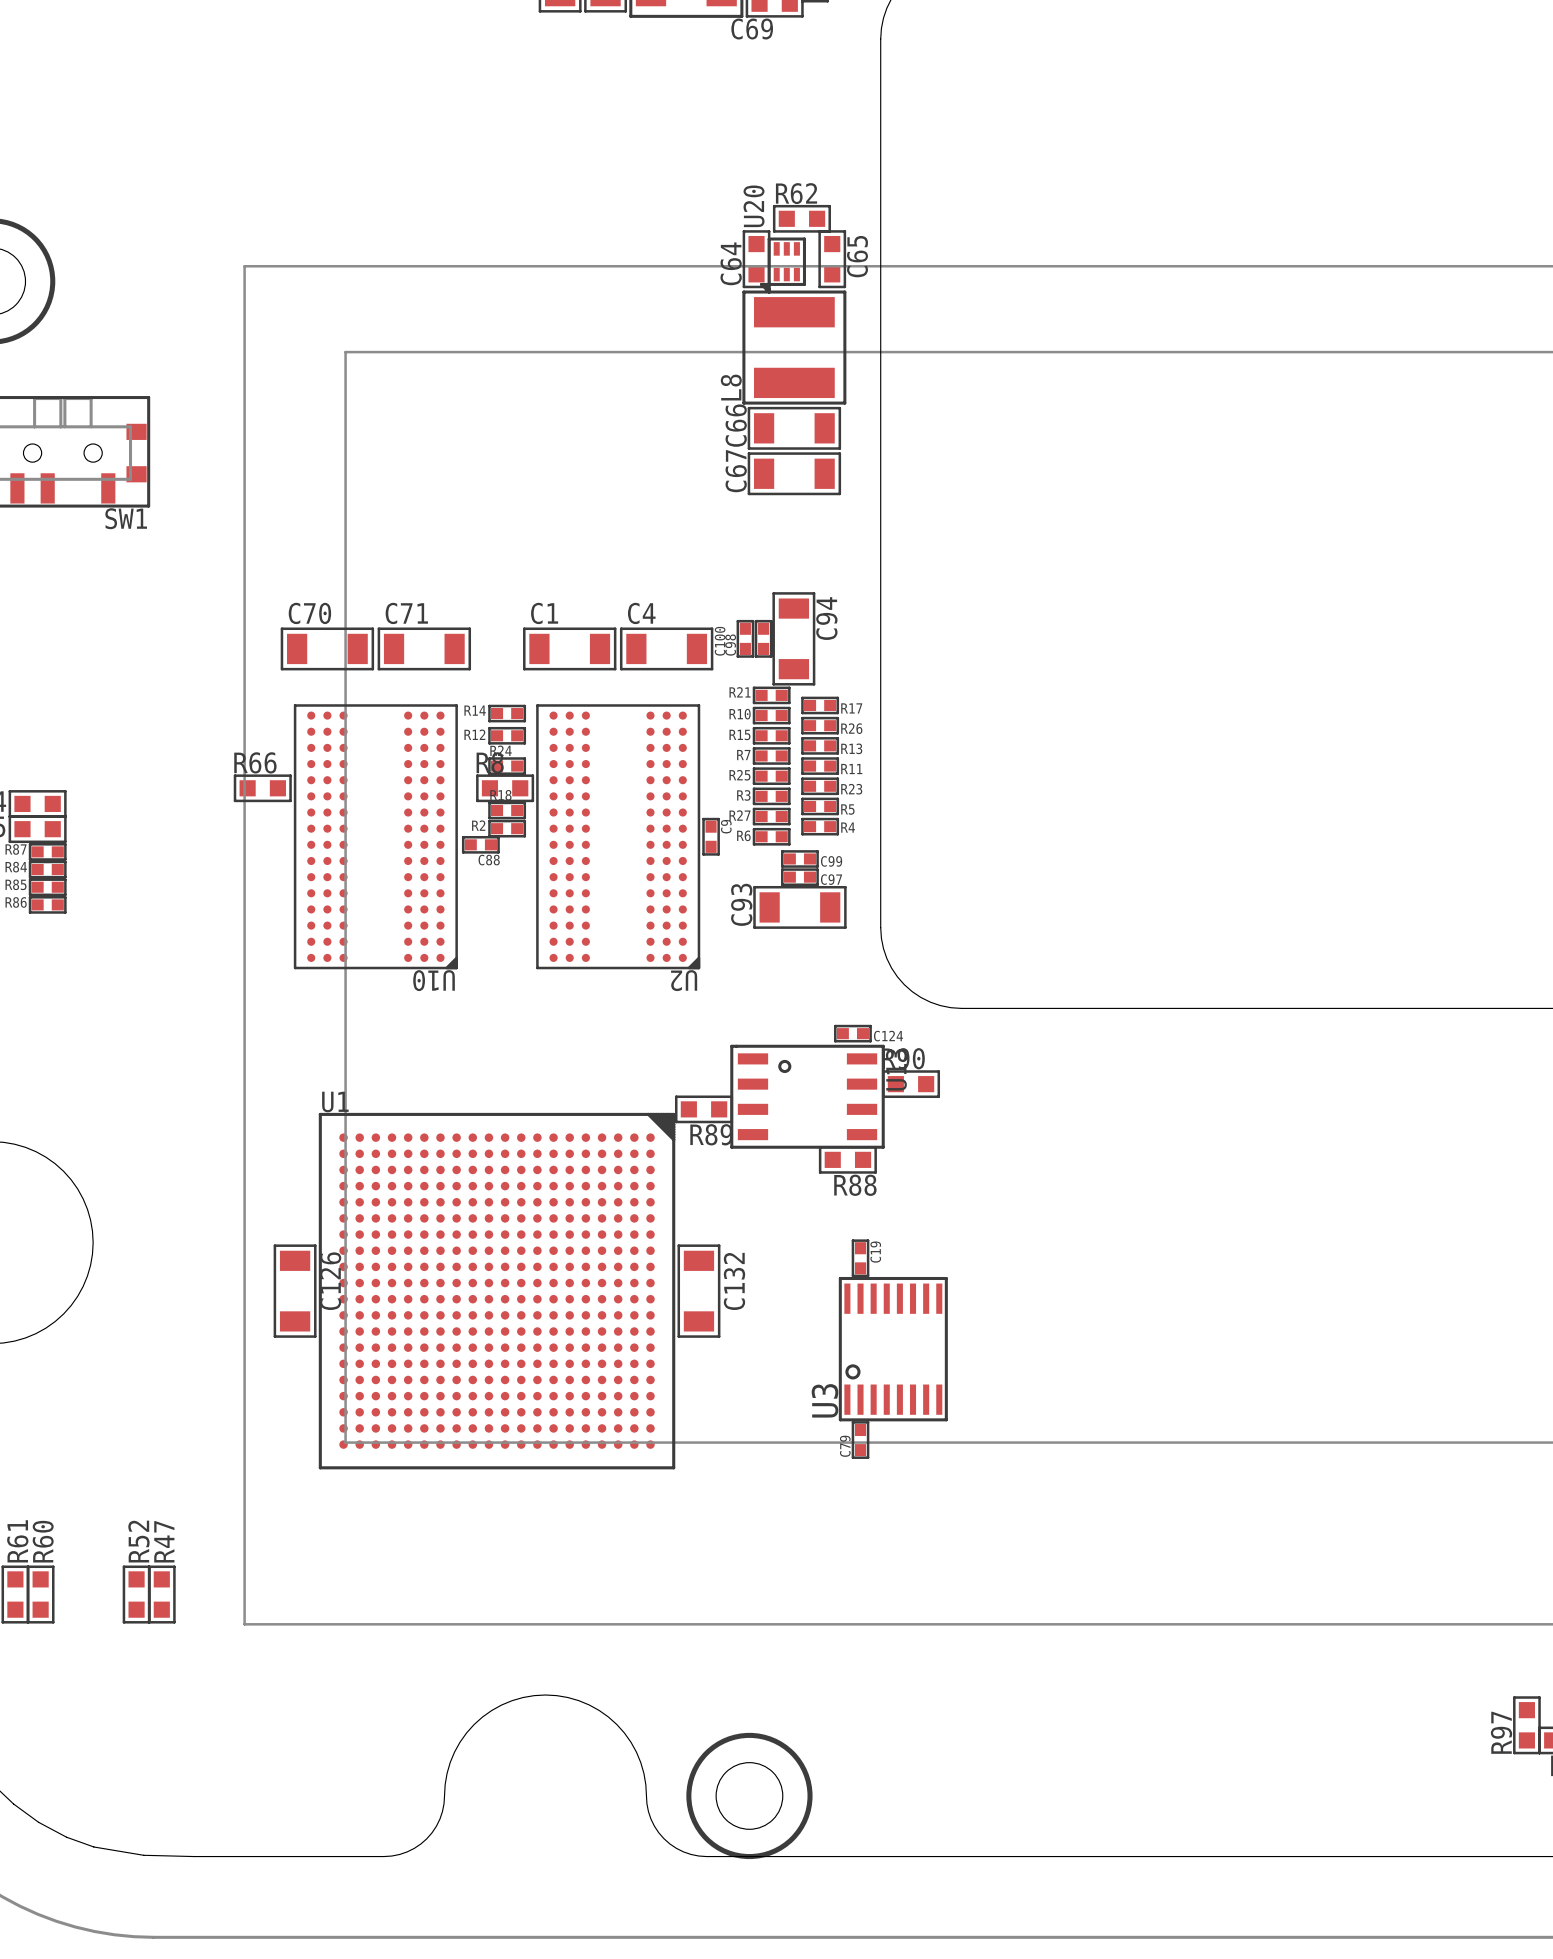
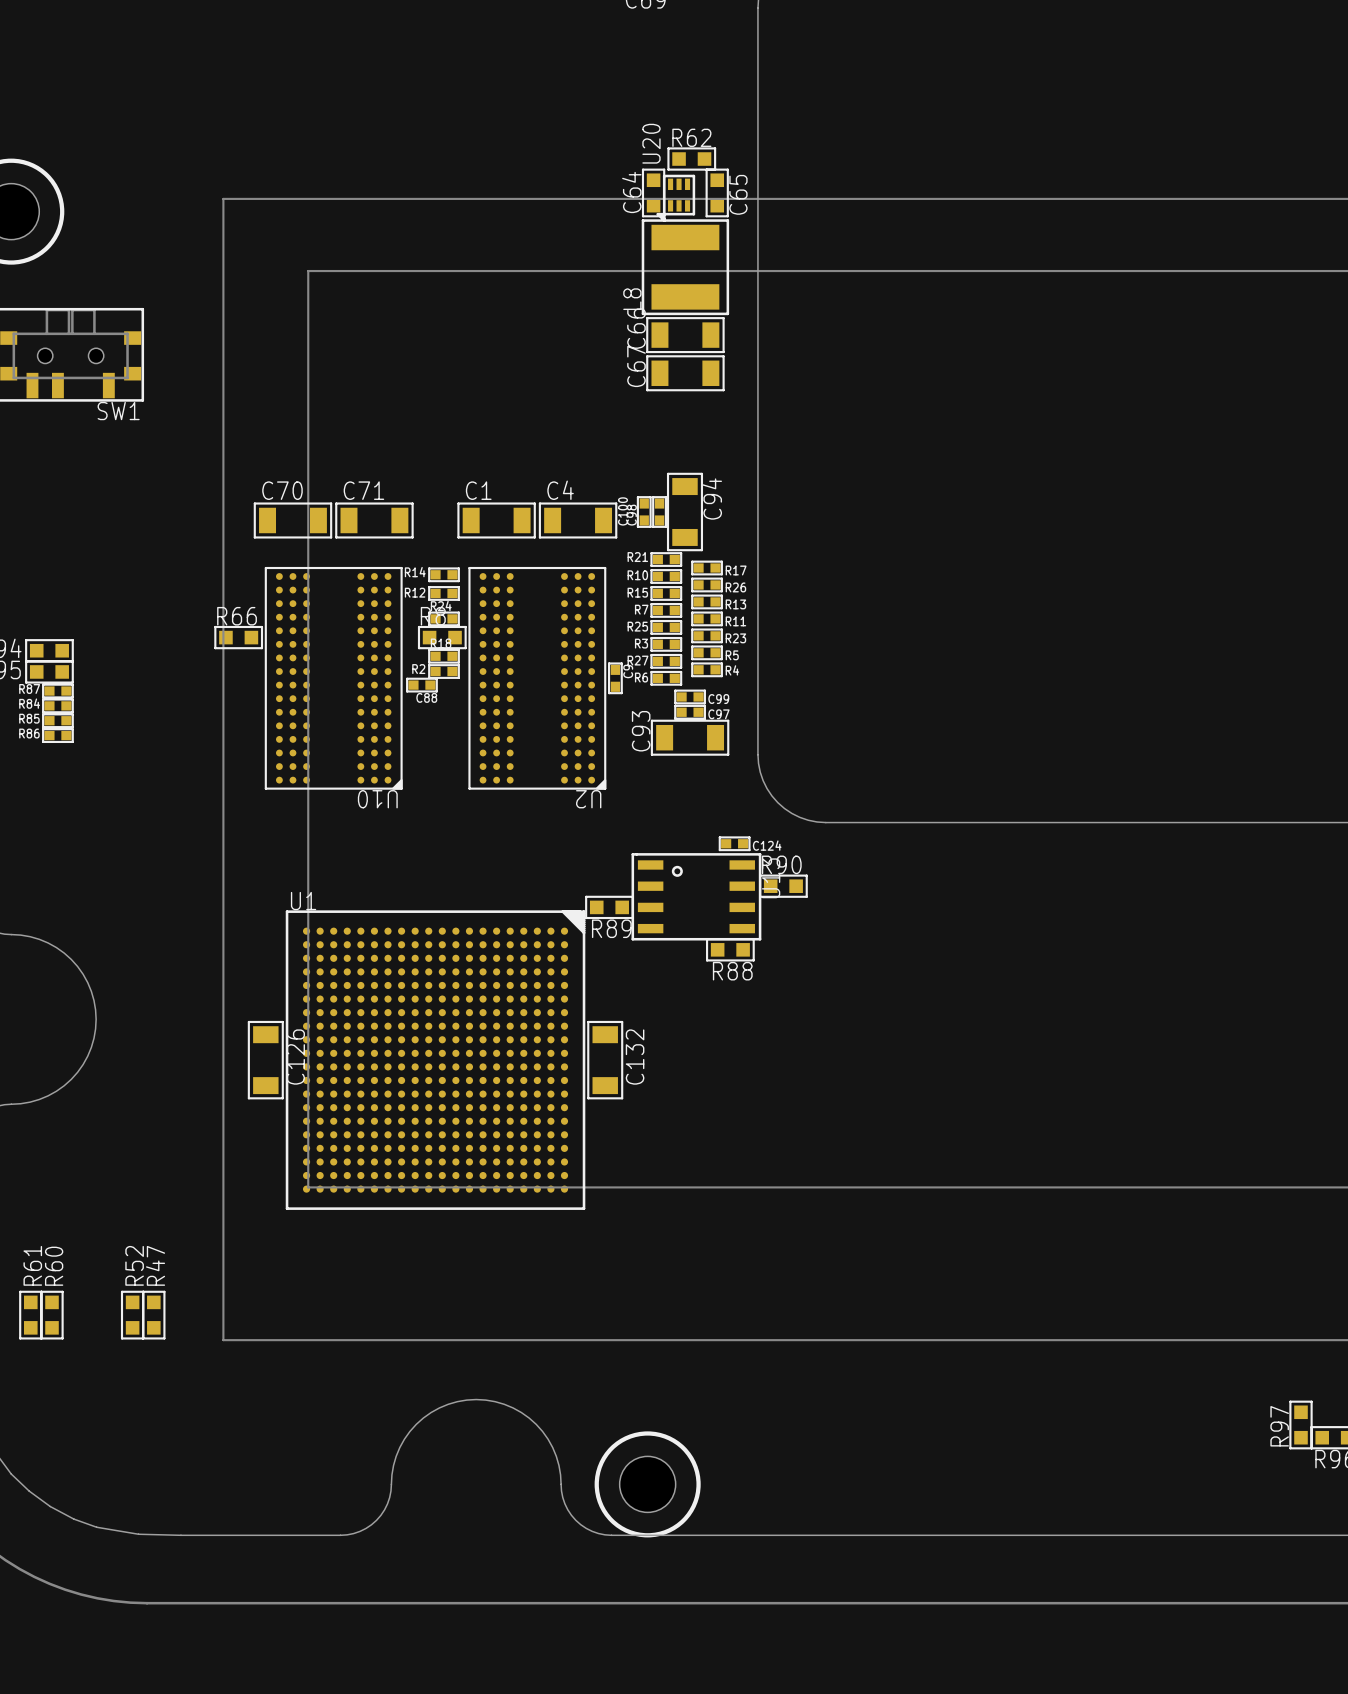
C19: (860, 1258) -> none
U3: (893, 1349) -> none
C79: (860, 1440) -> none

